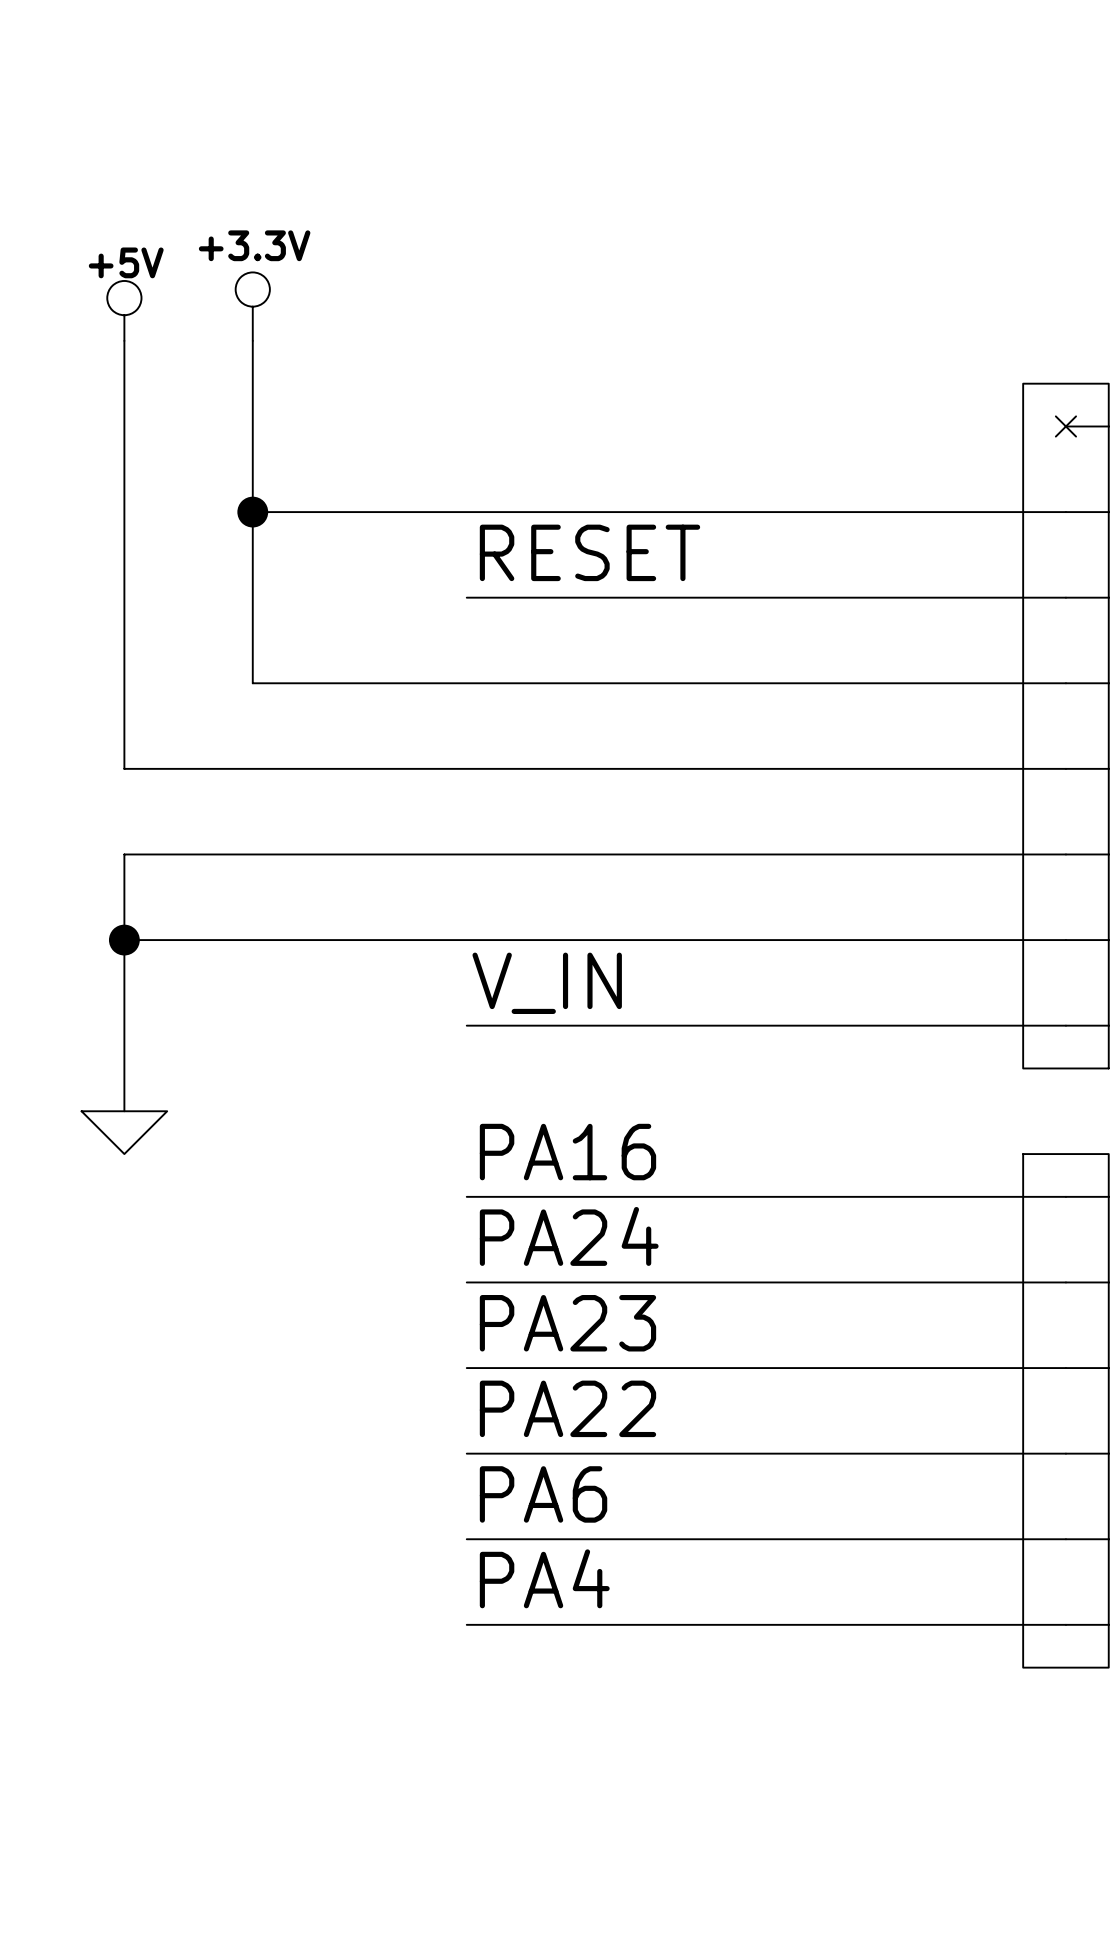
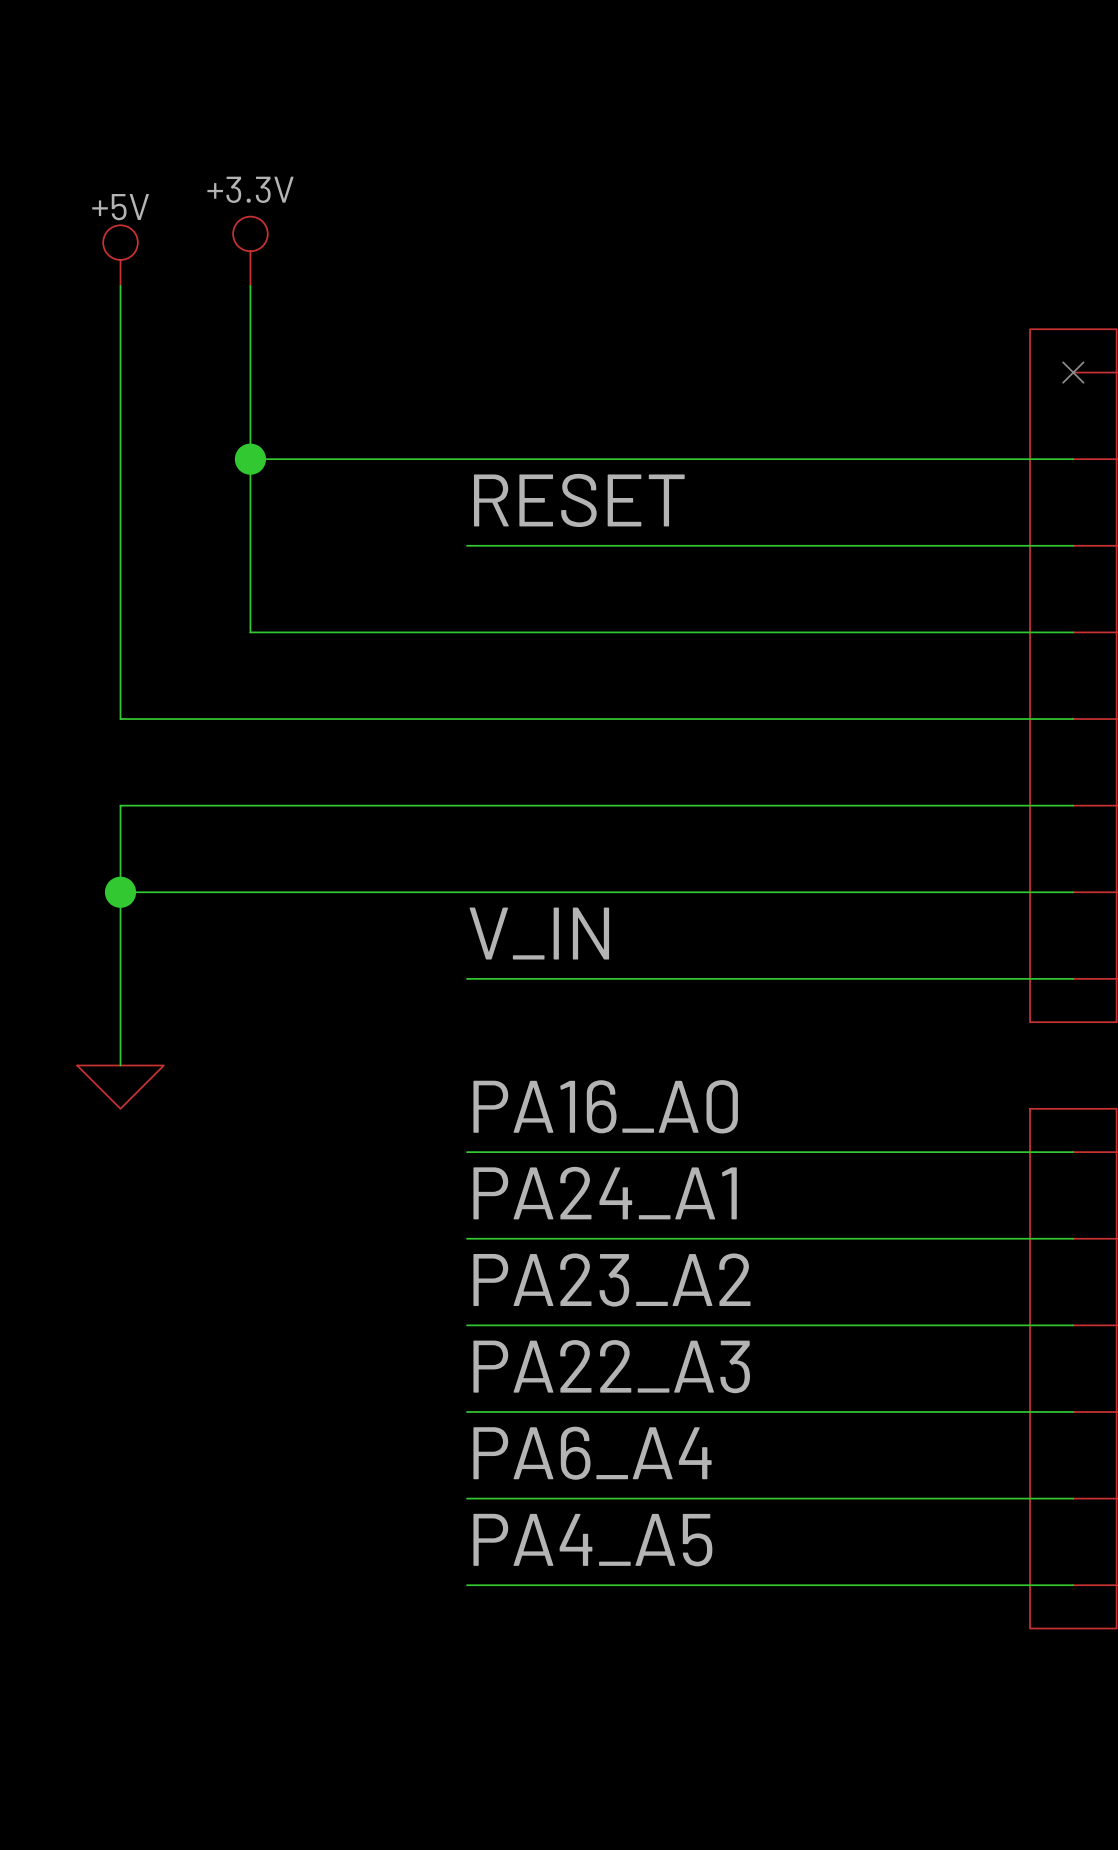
label: PA16 (567, 1152) -> PA16_A0 (605, 1106)
label: PA24 (569, 1236) -> PA24_A1 (605, 1193)
label: PA23 (567, 1323) -> PA23_A2 (611, 1280)
label: PA22 (567, 1408) -> PA22_A3 (611, 1366)
label: PA6 (543, 1494) -> PA6_A4 (592, 1453)
label: PA4 (544, 1578) -> PA4_A5 (592, 1540)

